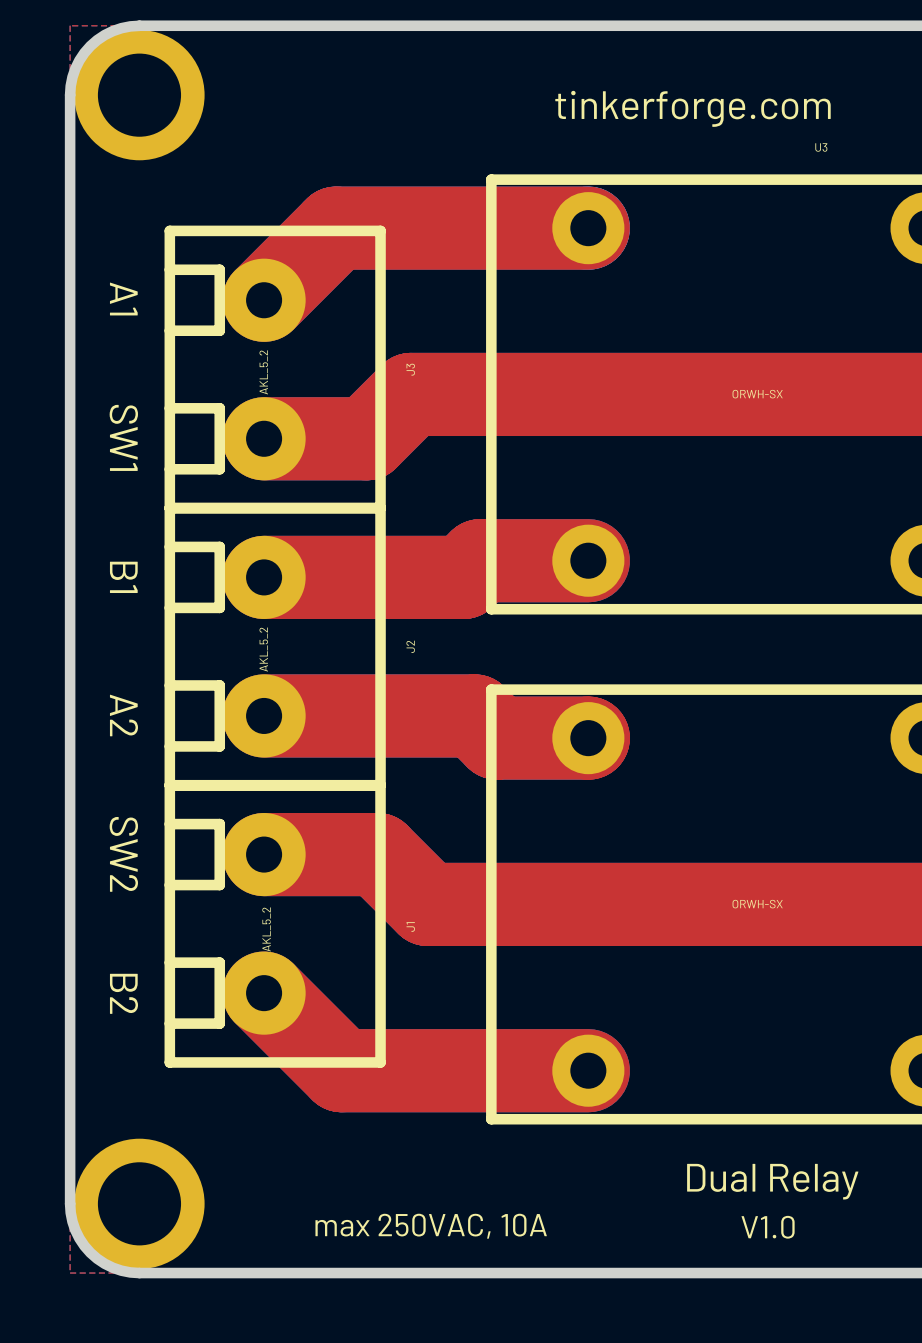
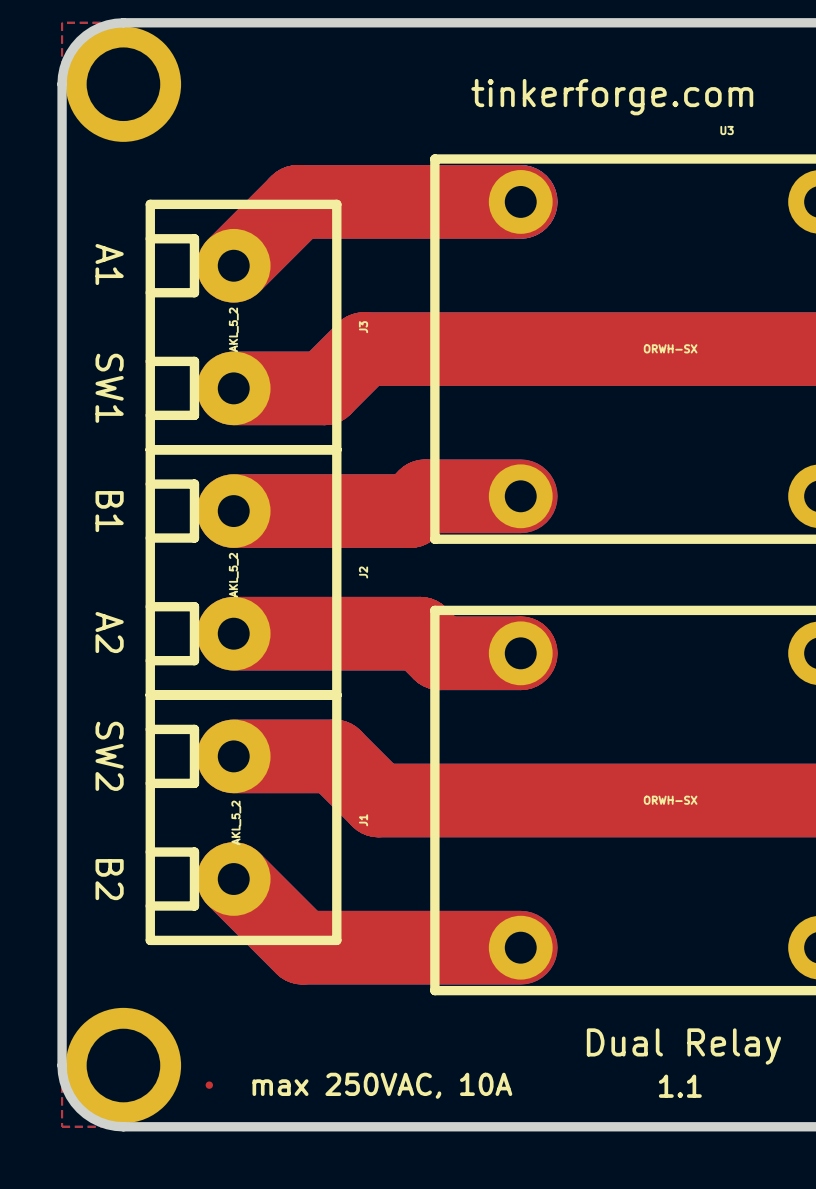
part: none -> (209, 1085)
text: V1.0 (768, 1227) -> 1.1 (680, 1086)

